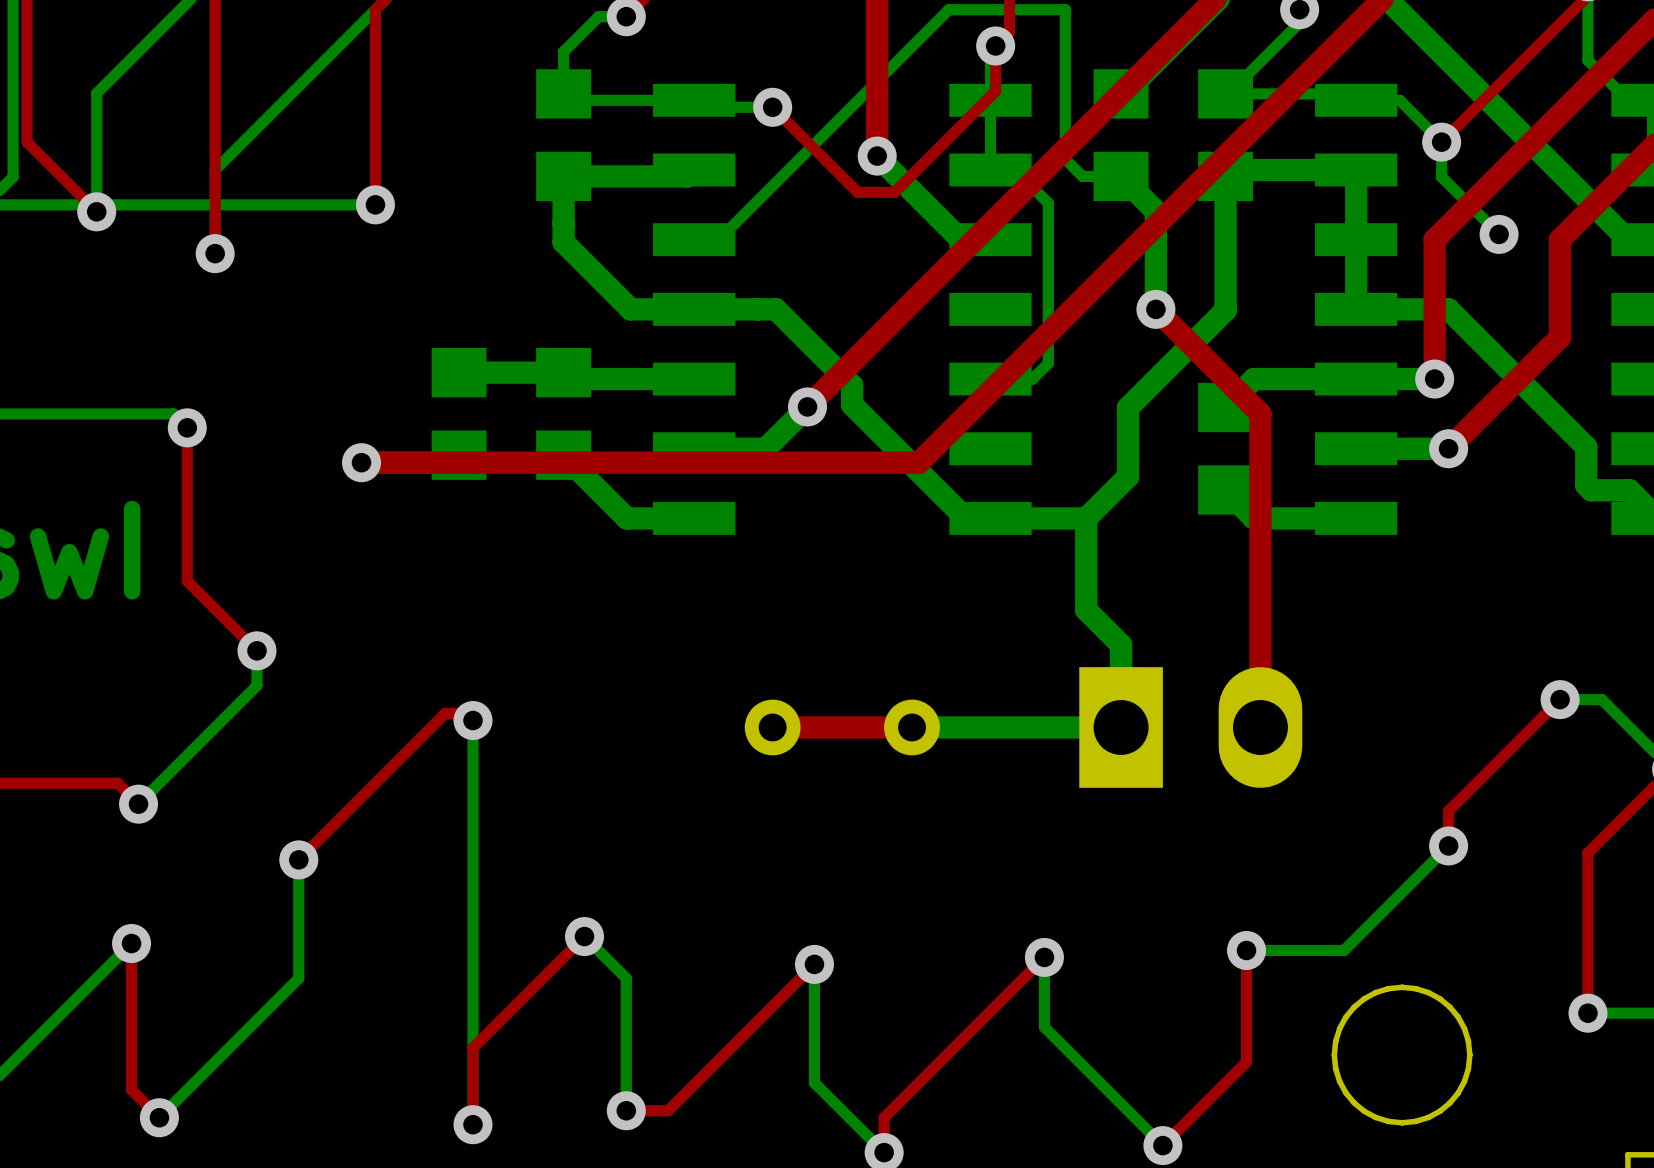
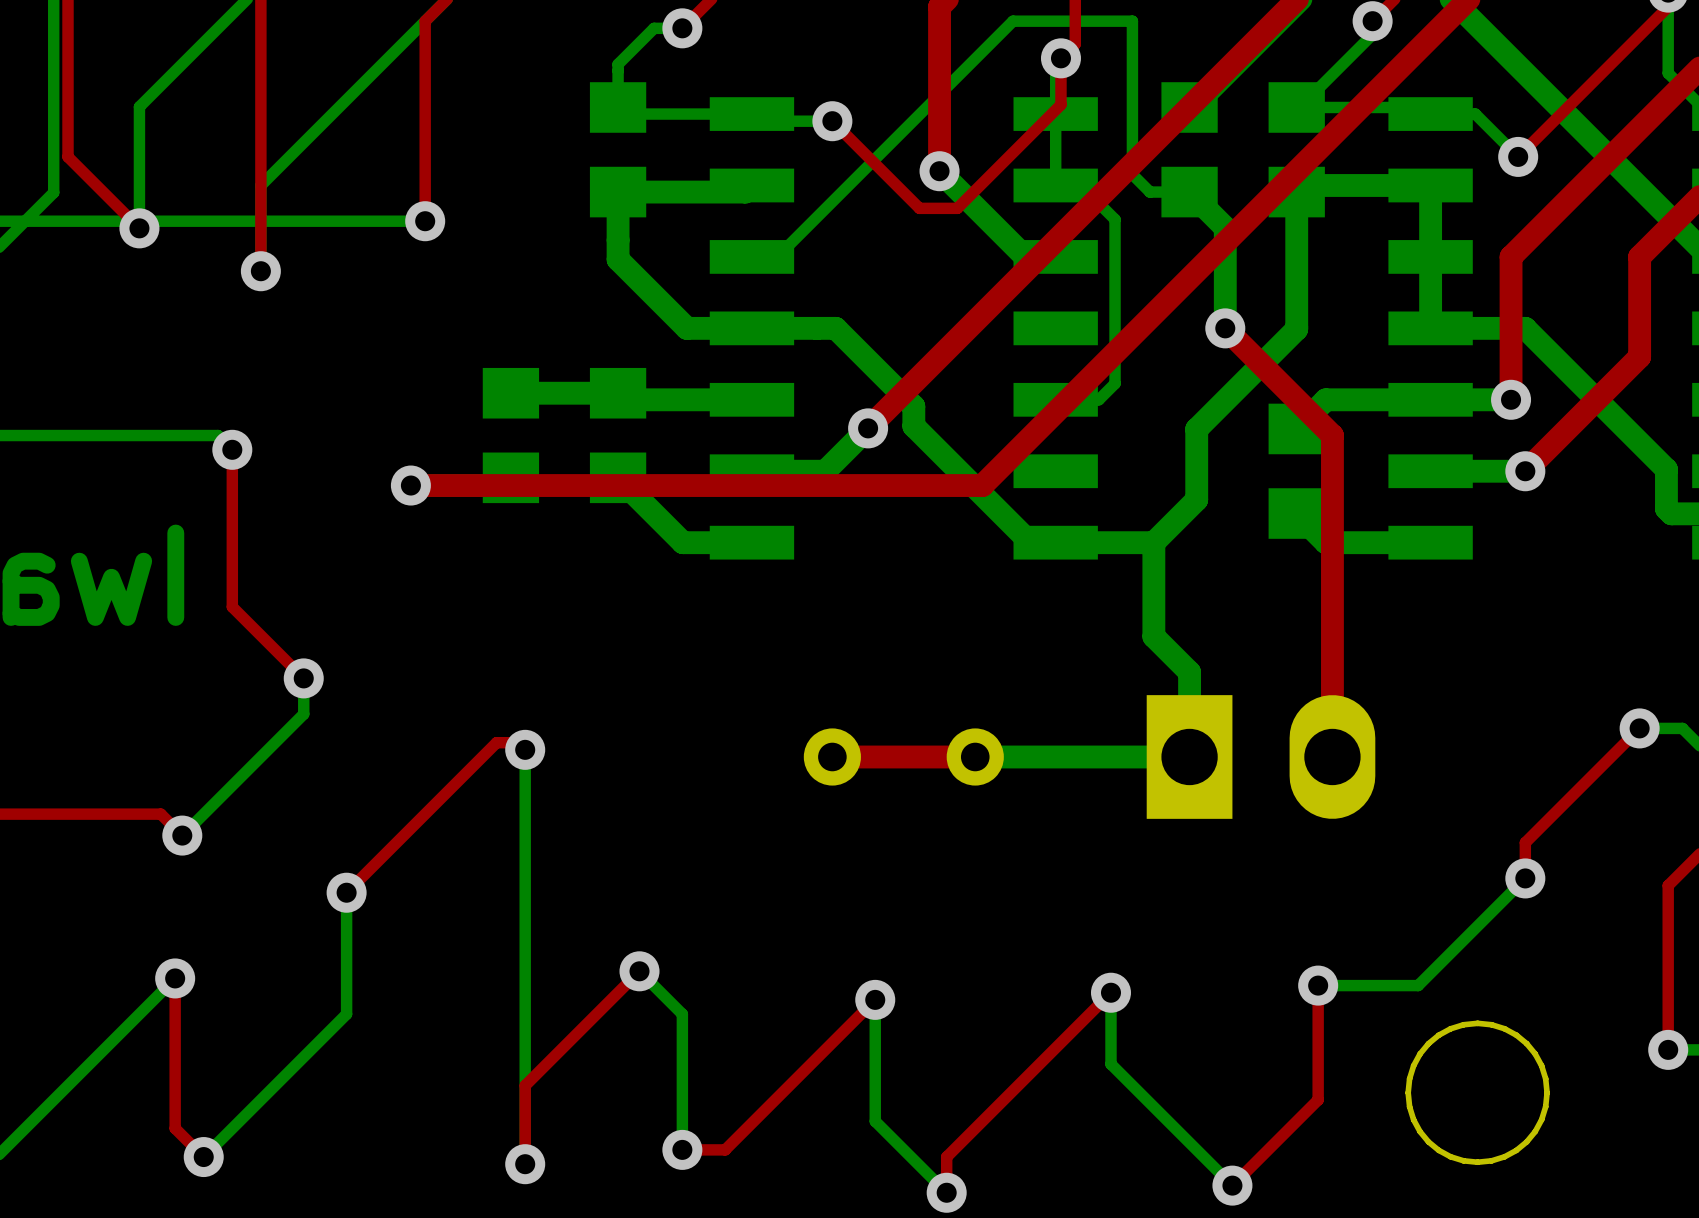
bottom track: (1441, 142) (1441, 176) (1499, 234) -> none
via: (1499, 234) -> none

